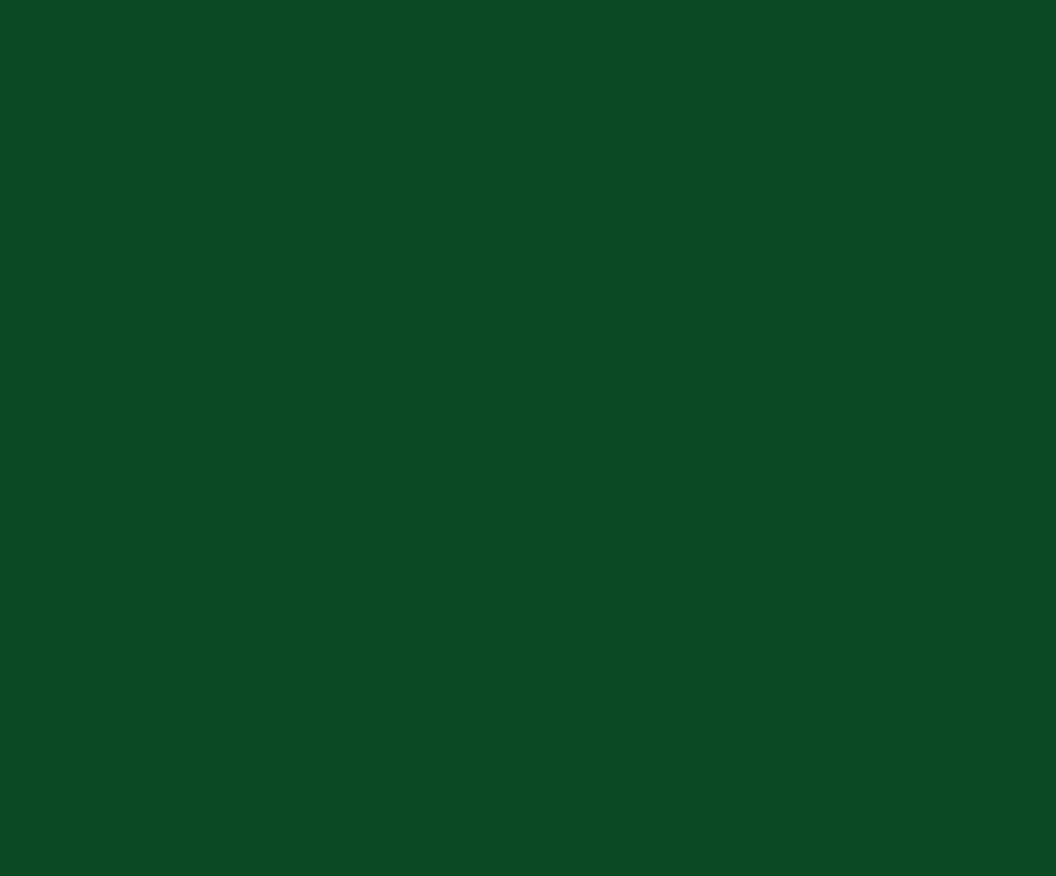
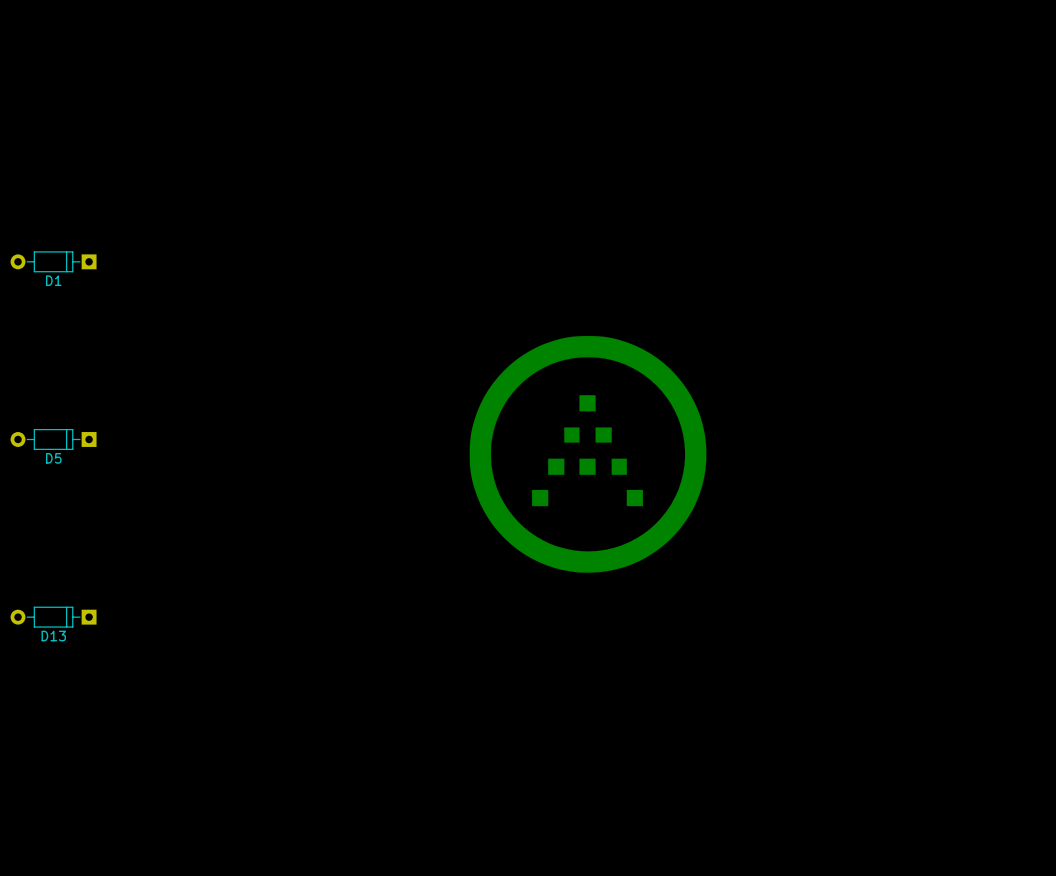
D1: none -> (53, 261)
drawing: none -> [469, 335, 707, 573]
D5: none -> (53, 439)
D13: none -> (53, 617)

